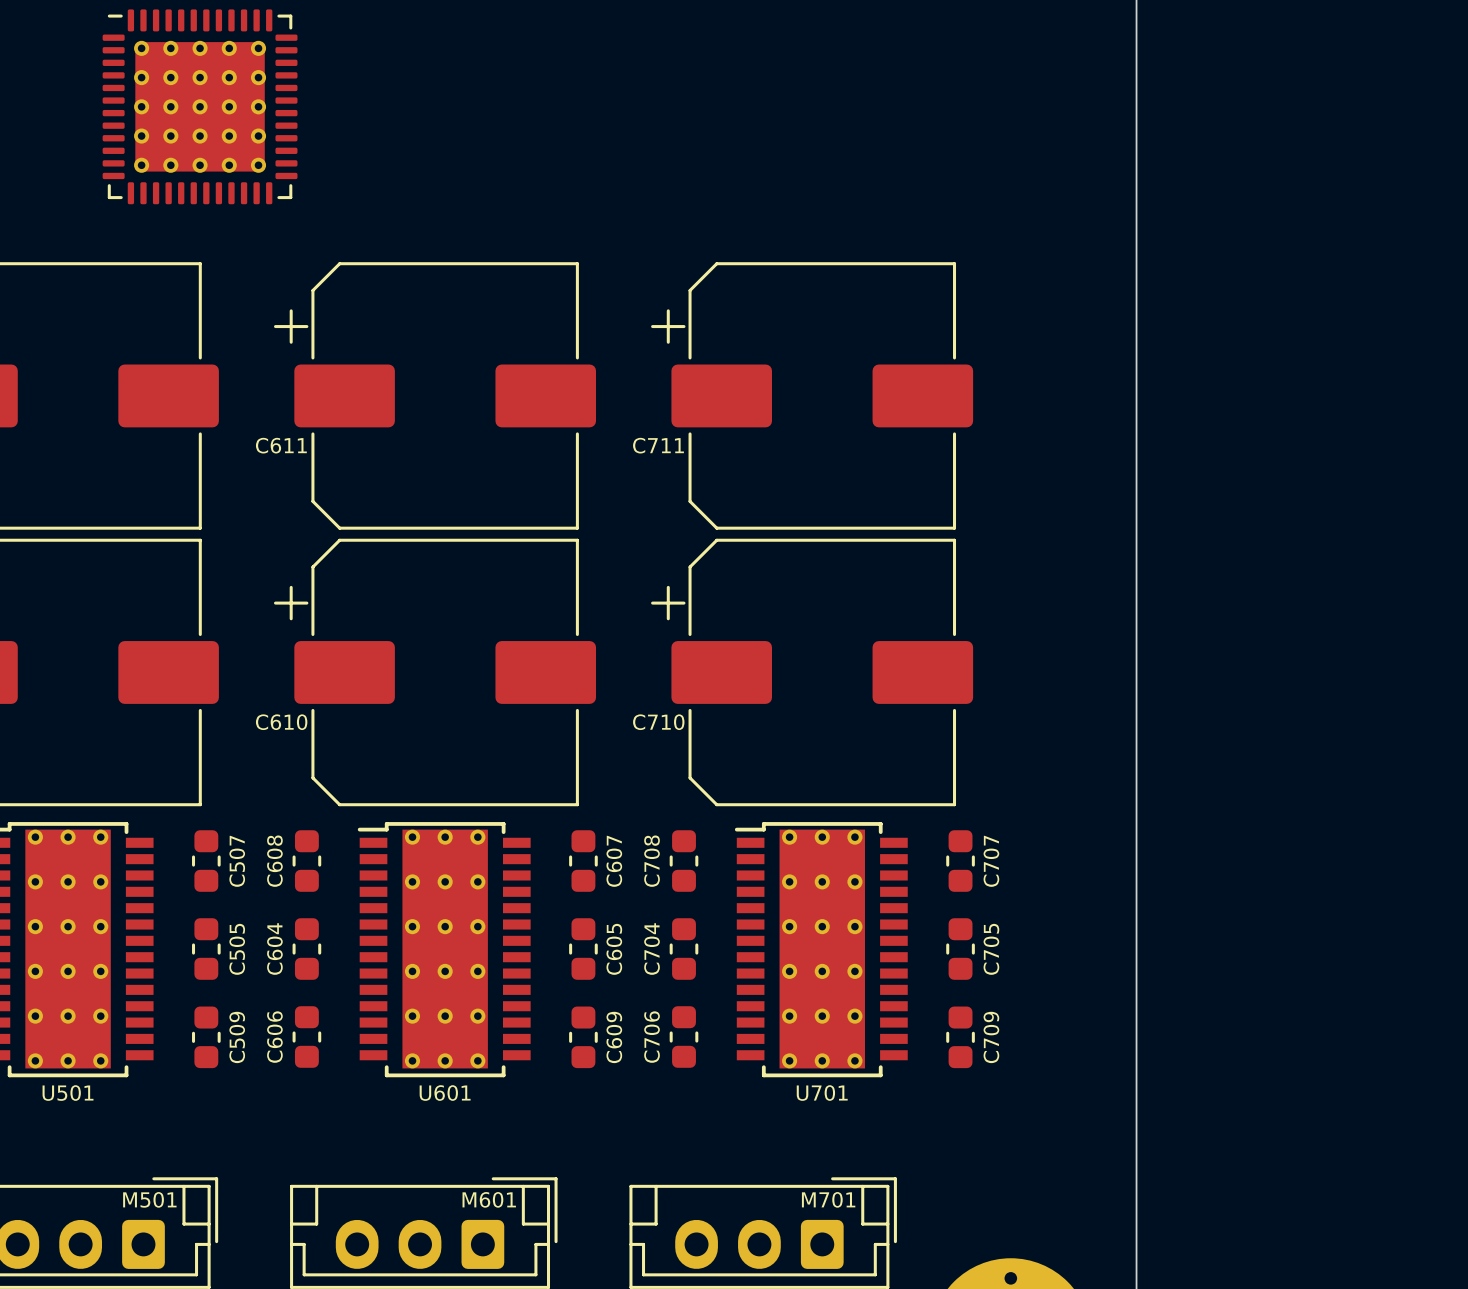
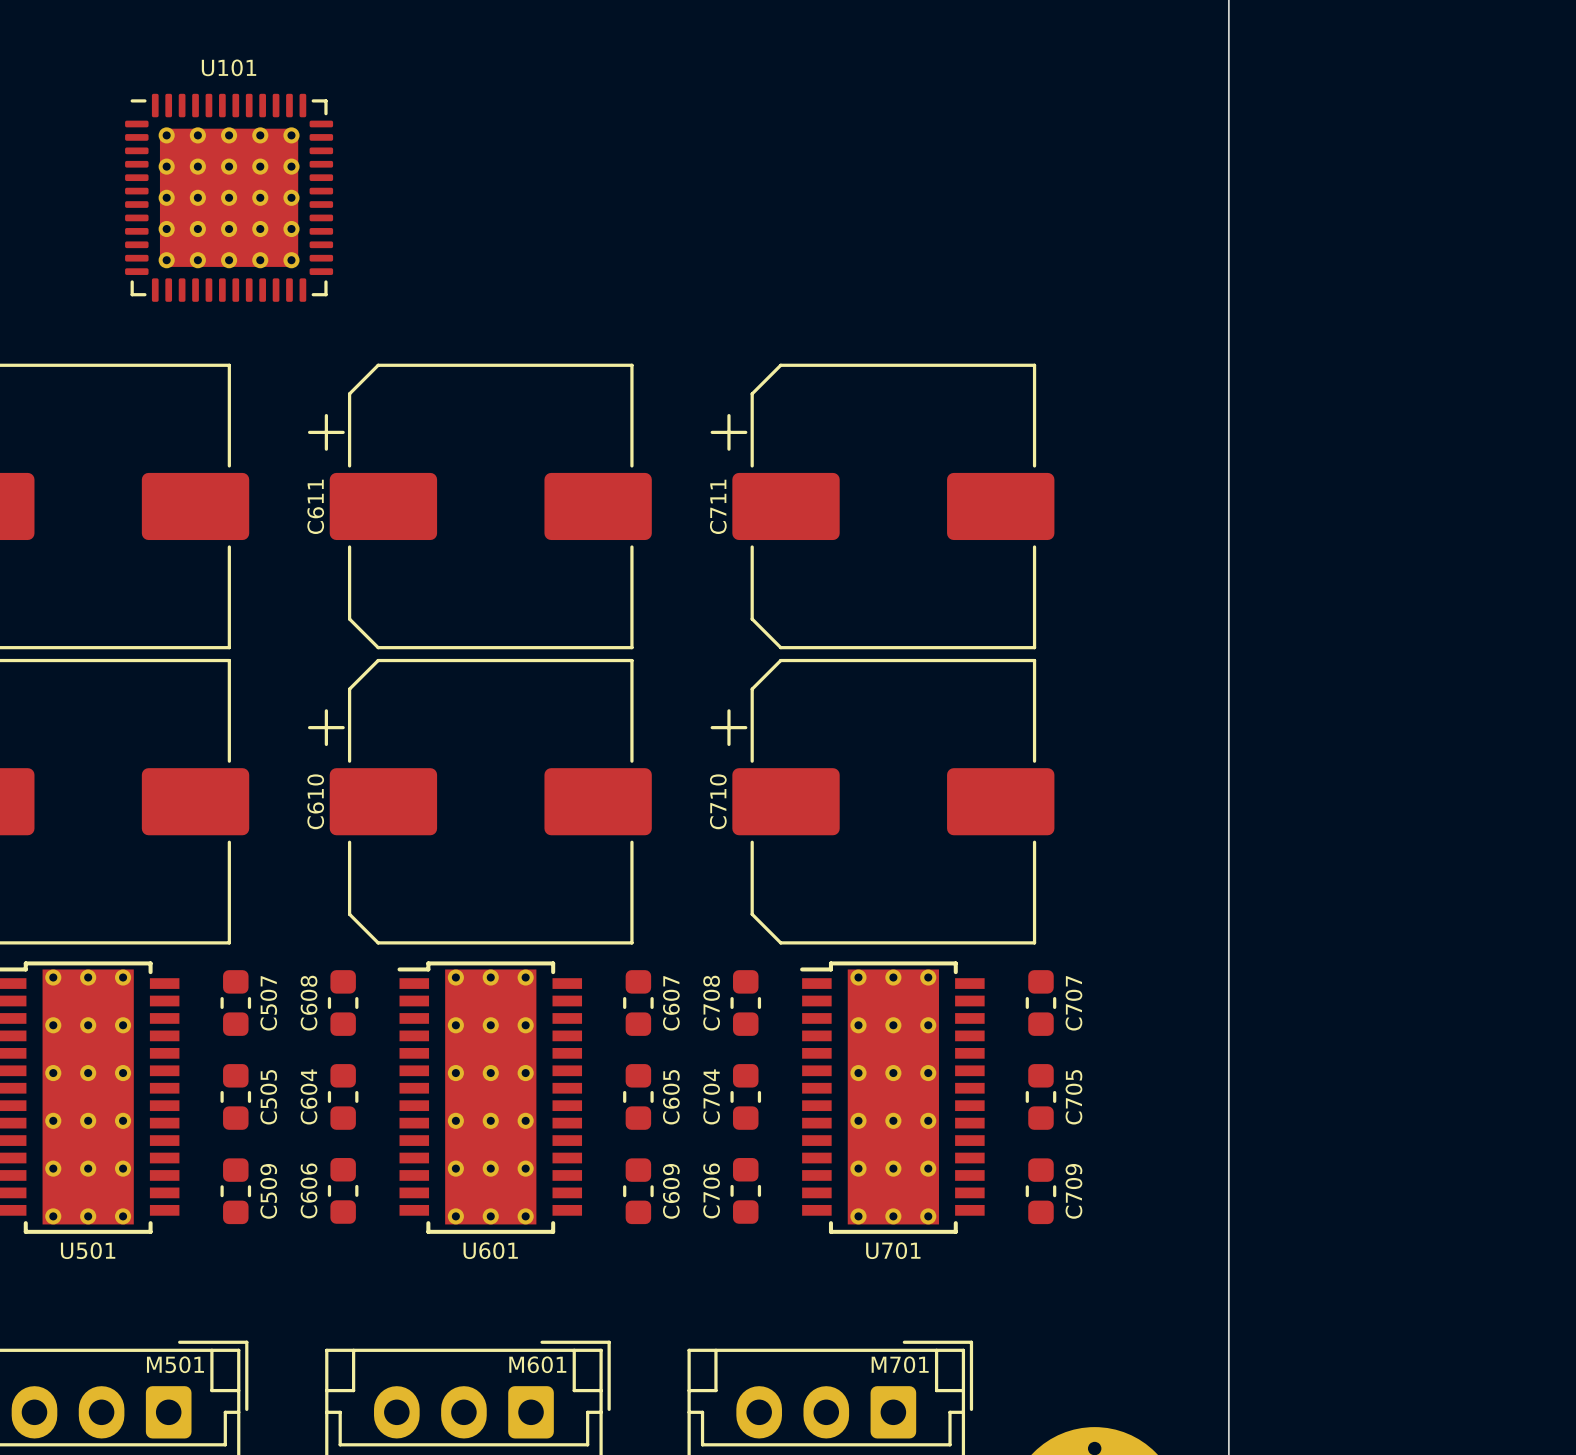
C611 name rotation: 0° (281, 445) -> 90° counterclockwise (315, 506)
C711 name rotation: 0° (658, 445) -> 90° counterclockwise (718, 506)
C610 name rotation: 0° (281, 722) -> 90° counterclockwise (315, 801)
C710 name rotation: 0° (658, 722) -> 90° counterclockwise (718, 801)

